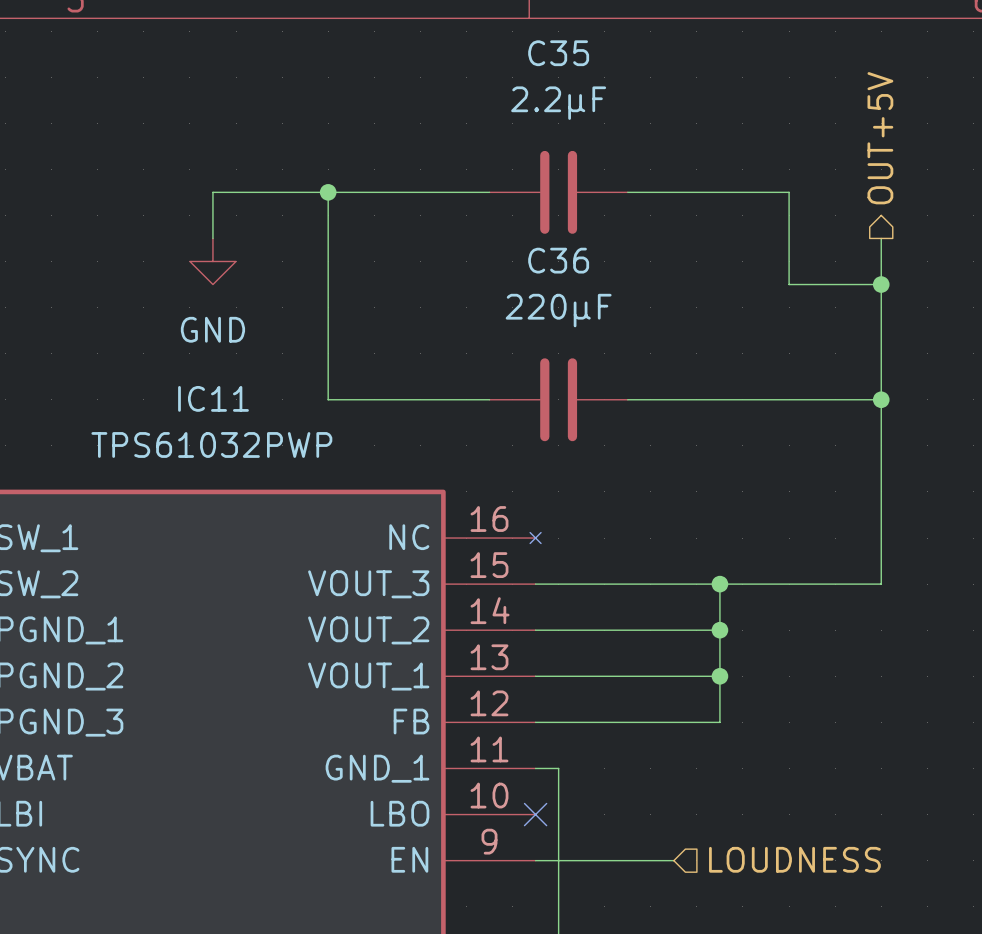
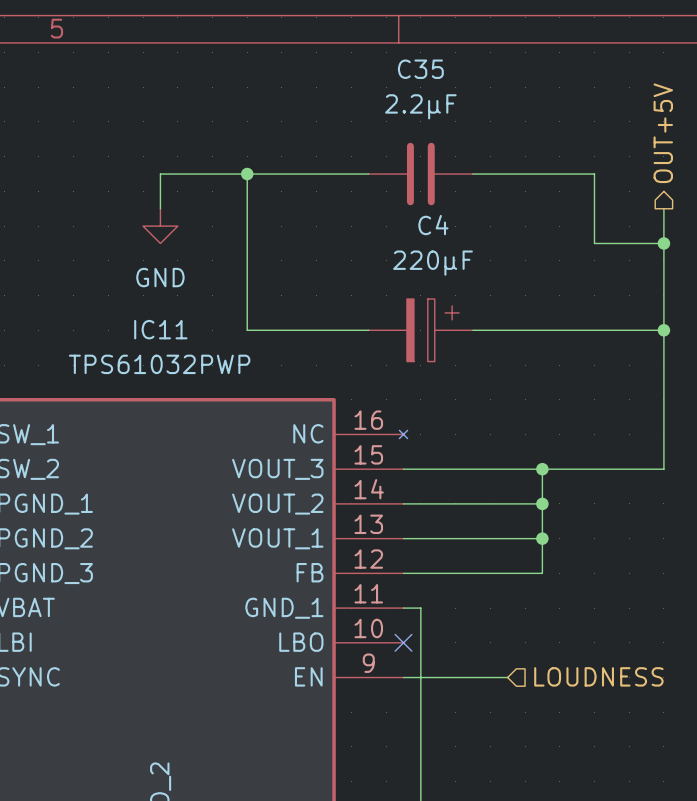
C36: 220µF (558, 399) -> none
C4: none -> 220µF (420, 330)

